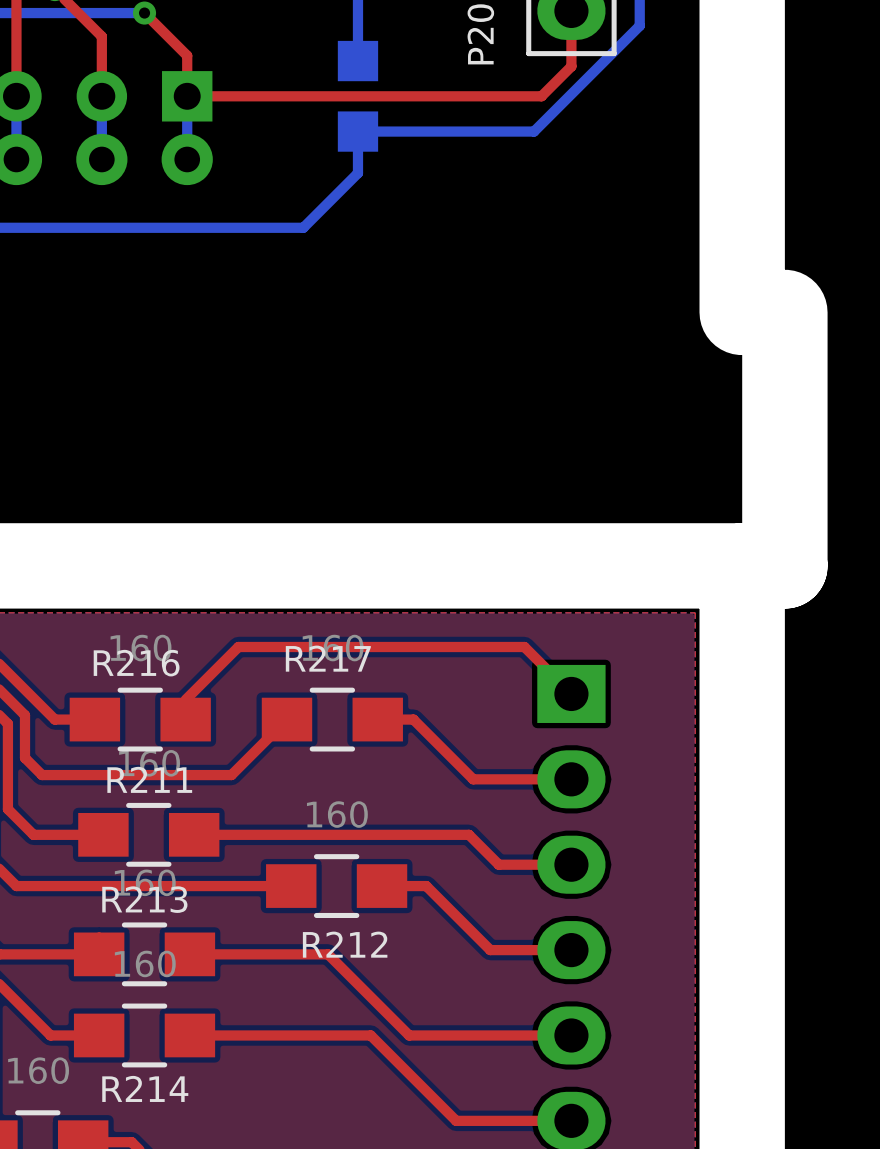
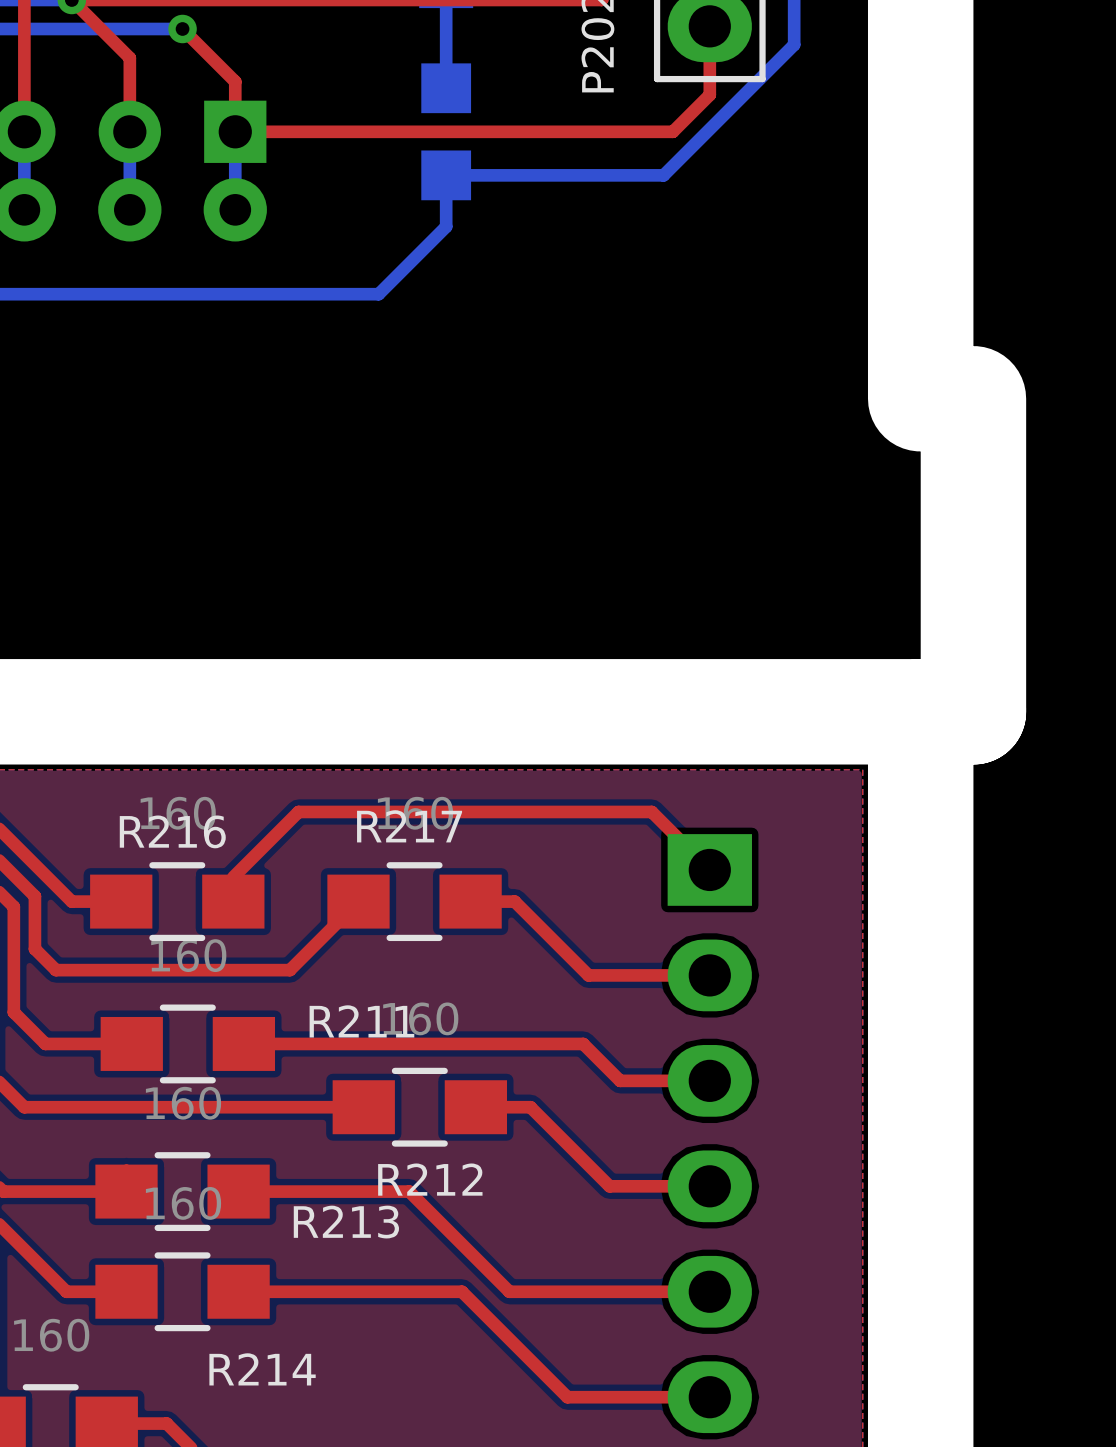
R211 name position: R211 (149, 779) -> R211 (361, 1021)
R213 name position: R213 (144, 899) -> R213 (346, 1222)
R214 name position: R214 (145, 1088) -> R214 (262, 1369)

